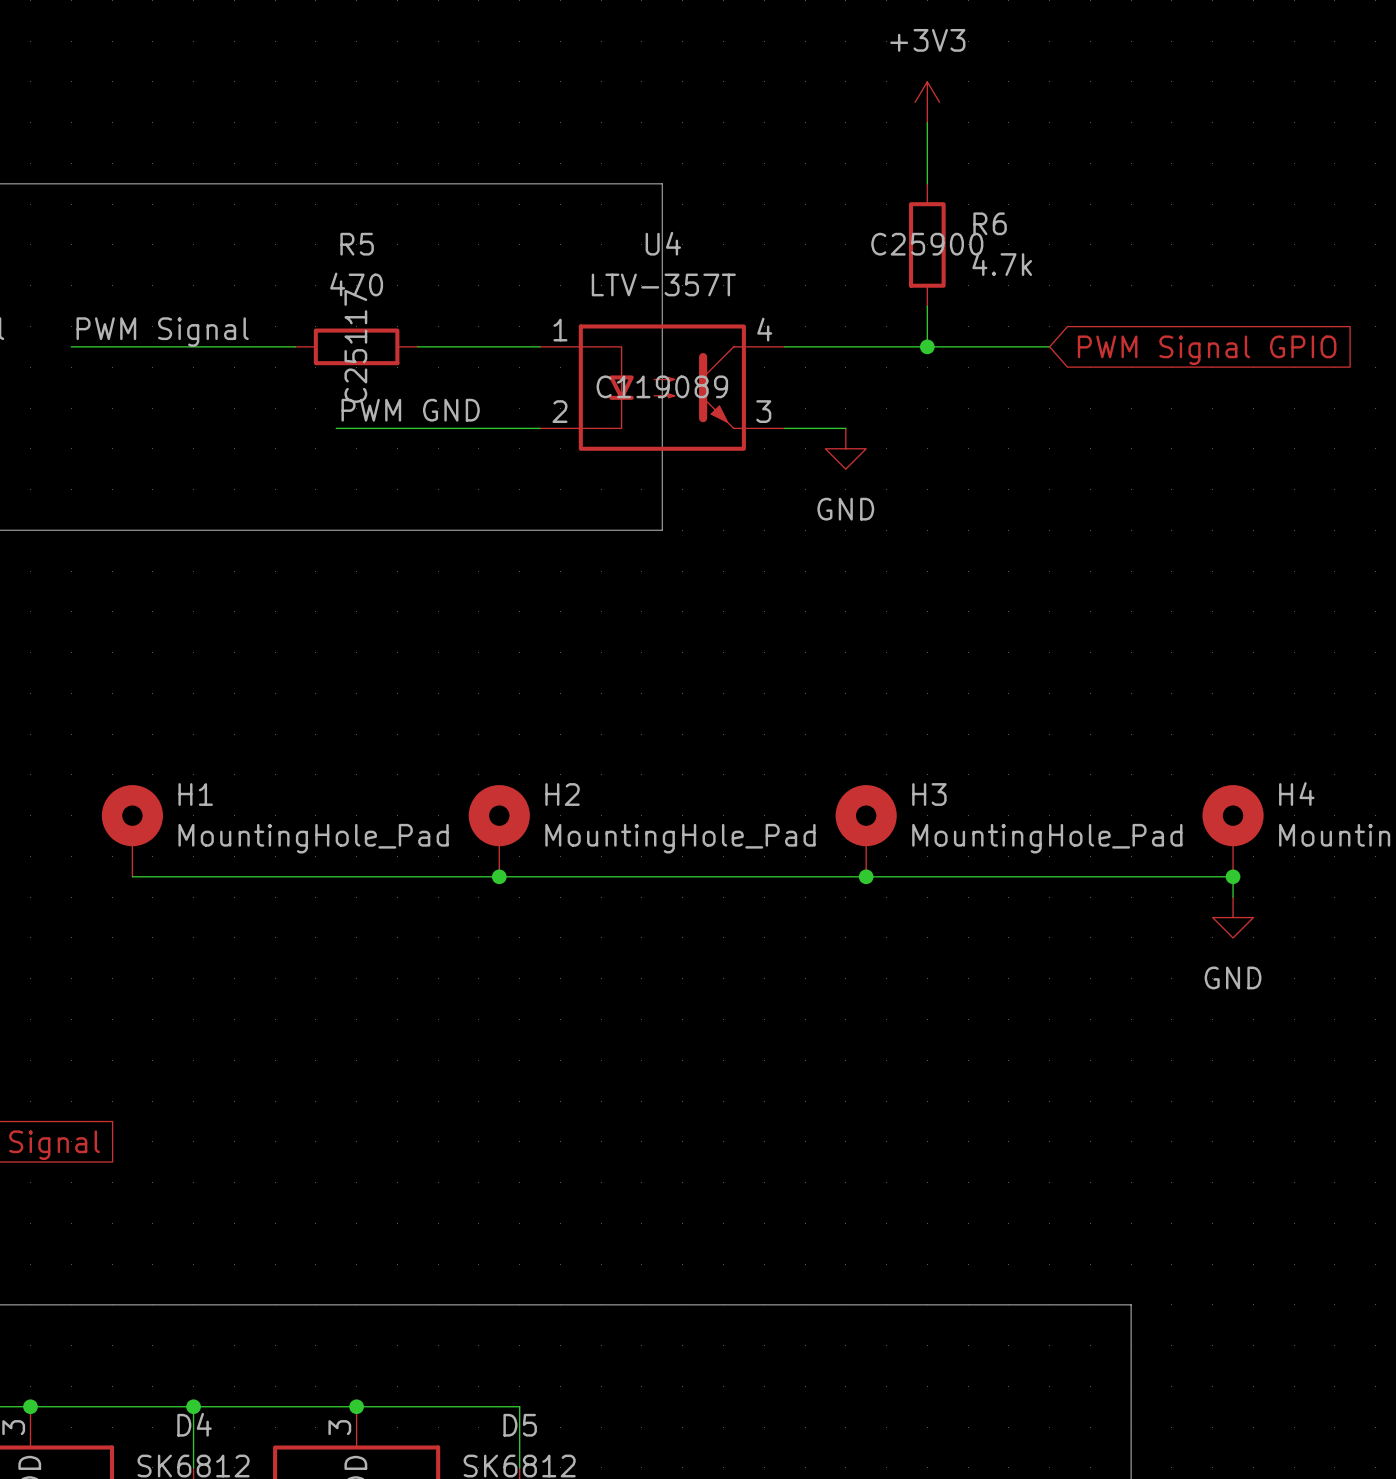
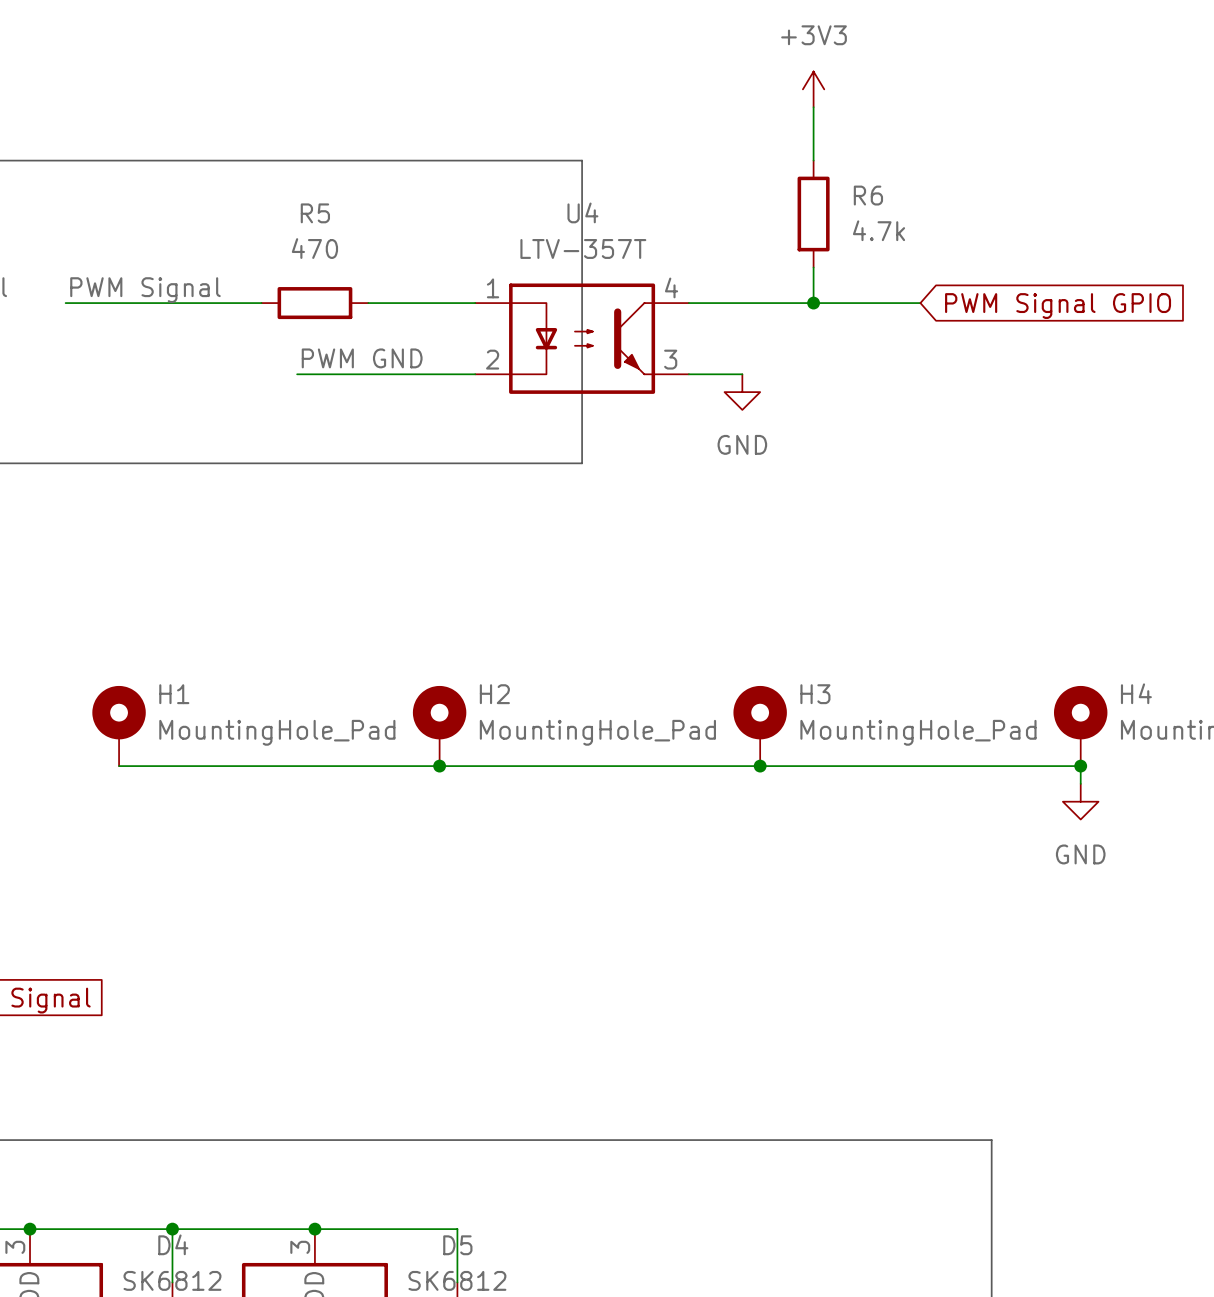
R6 text: C25900 (927, 244) -> none
R5 text: C25117 (355, 346) -> none
U4 text: C119089 (662, 386) -> none

